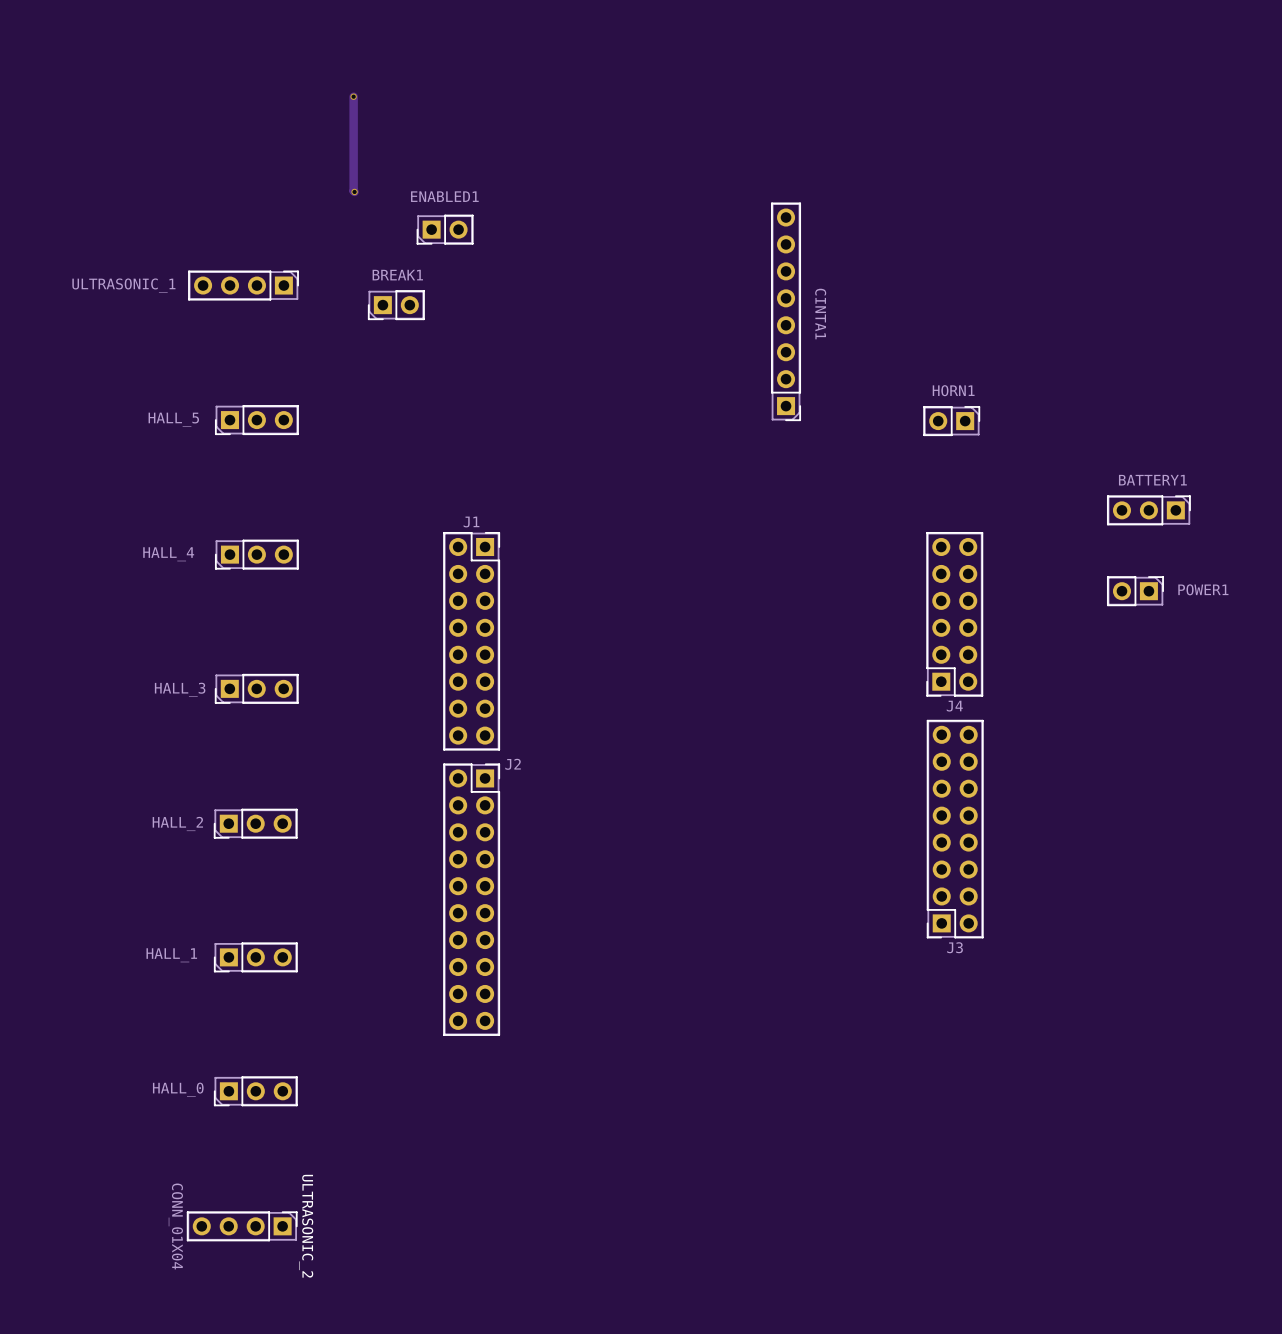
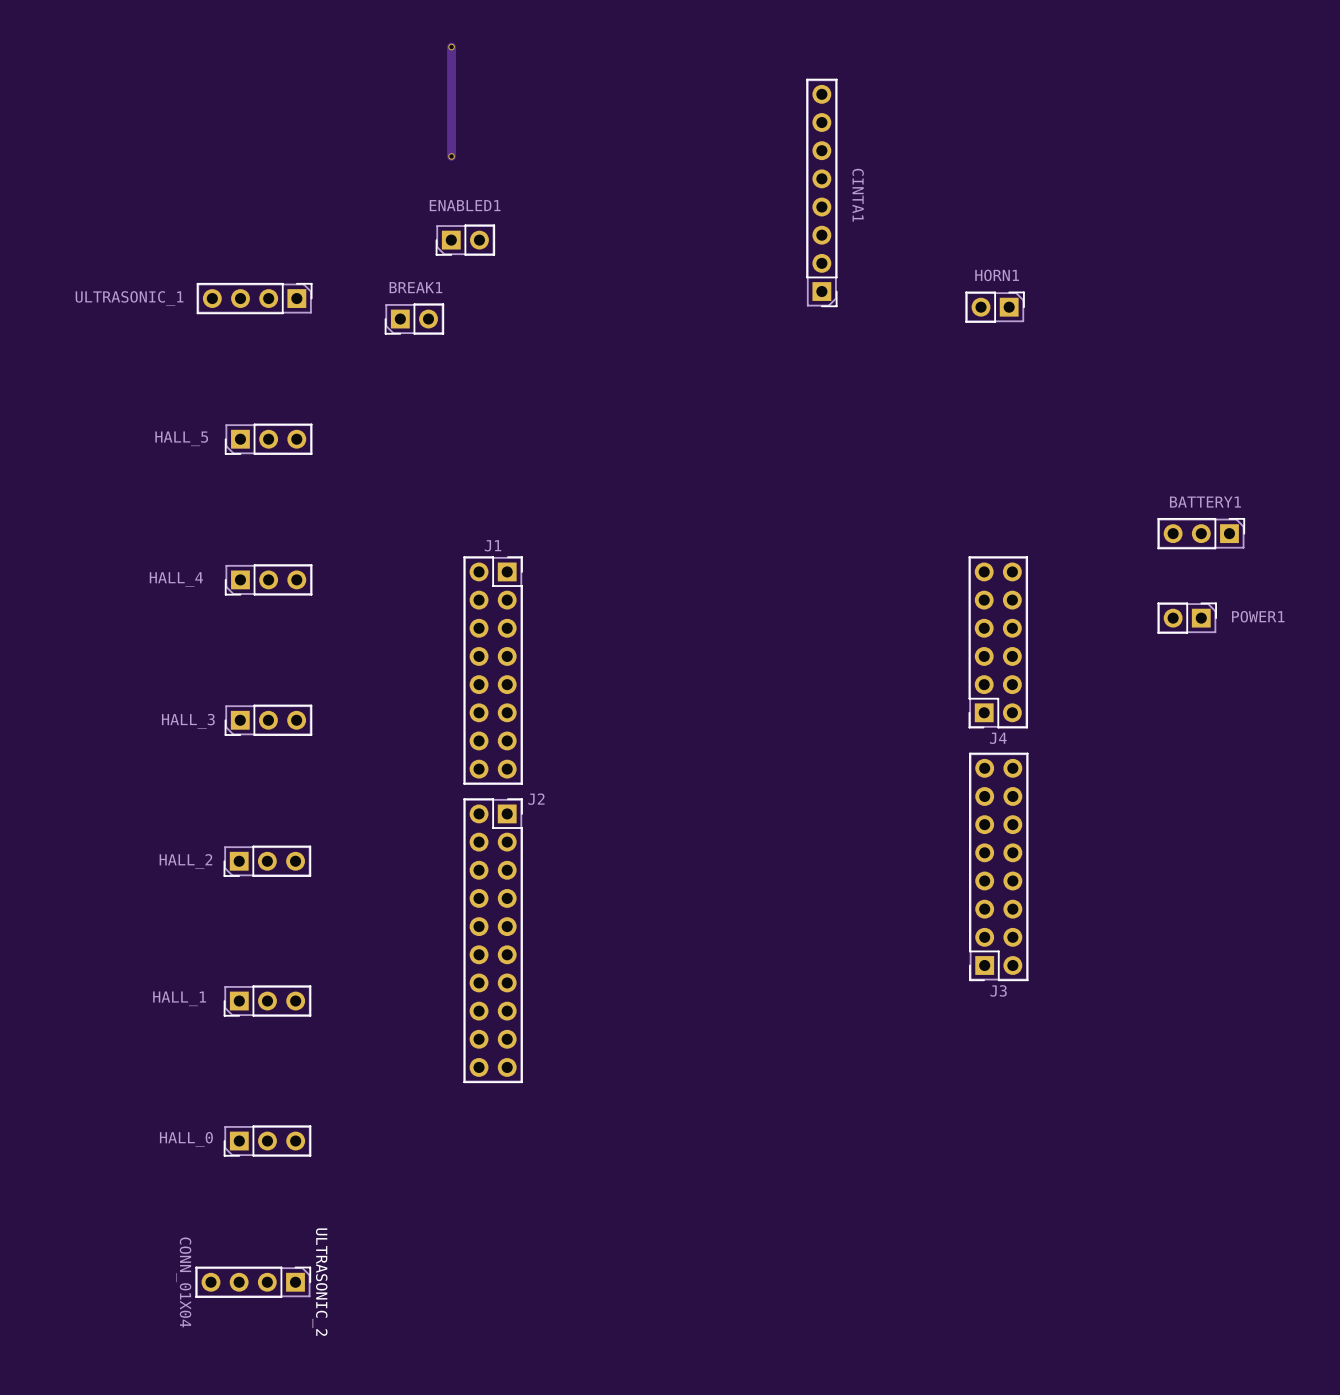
track: none -> (451, 47) (451, 156)
via: none -> (451, 47)
track: (353, 96) (354, 191) -> none
via: (353, 96) -> none
via: none -> (451, 156)
via: (354, 191) -> none
CINTA1 position: (786, 311) -> (821, 192)
HORN1 position: (951, 421) -> (995, 307)

